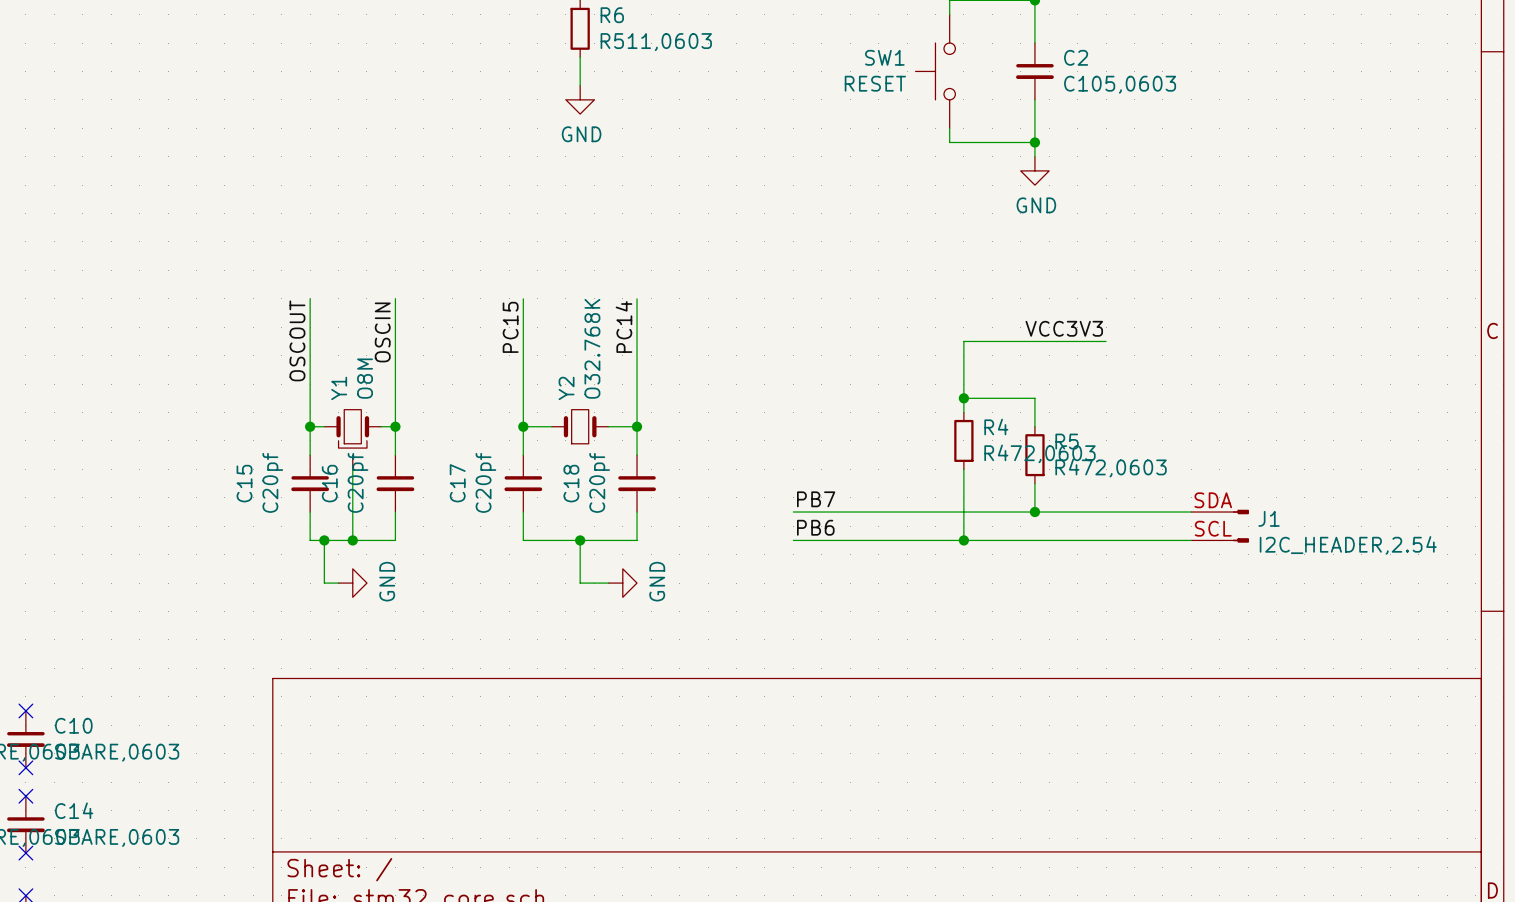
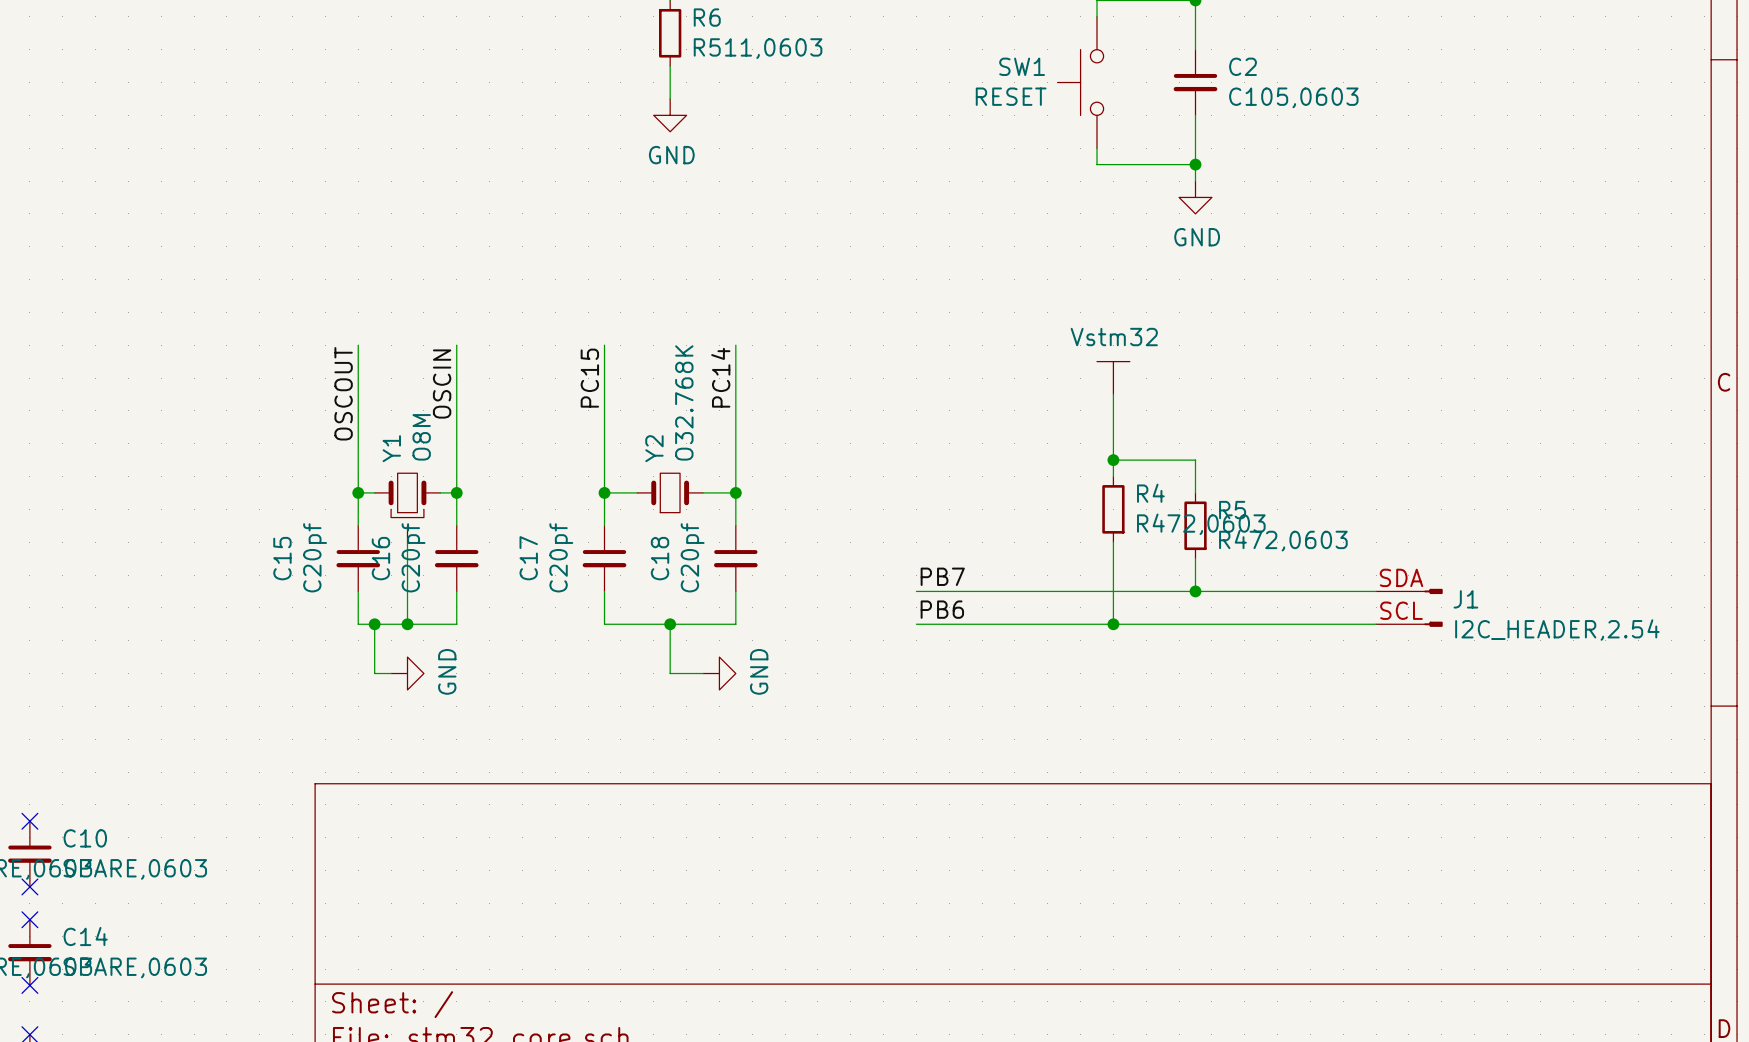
power symbol: none -> Vstm32 (1113, 378)
label: VCC3V3 (1064, 328) -> none
wire: (963, 341) (1106, 341) -> none

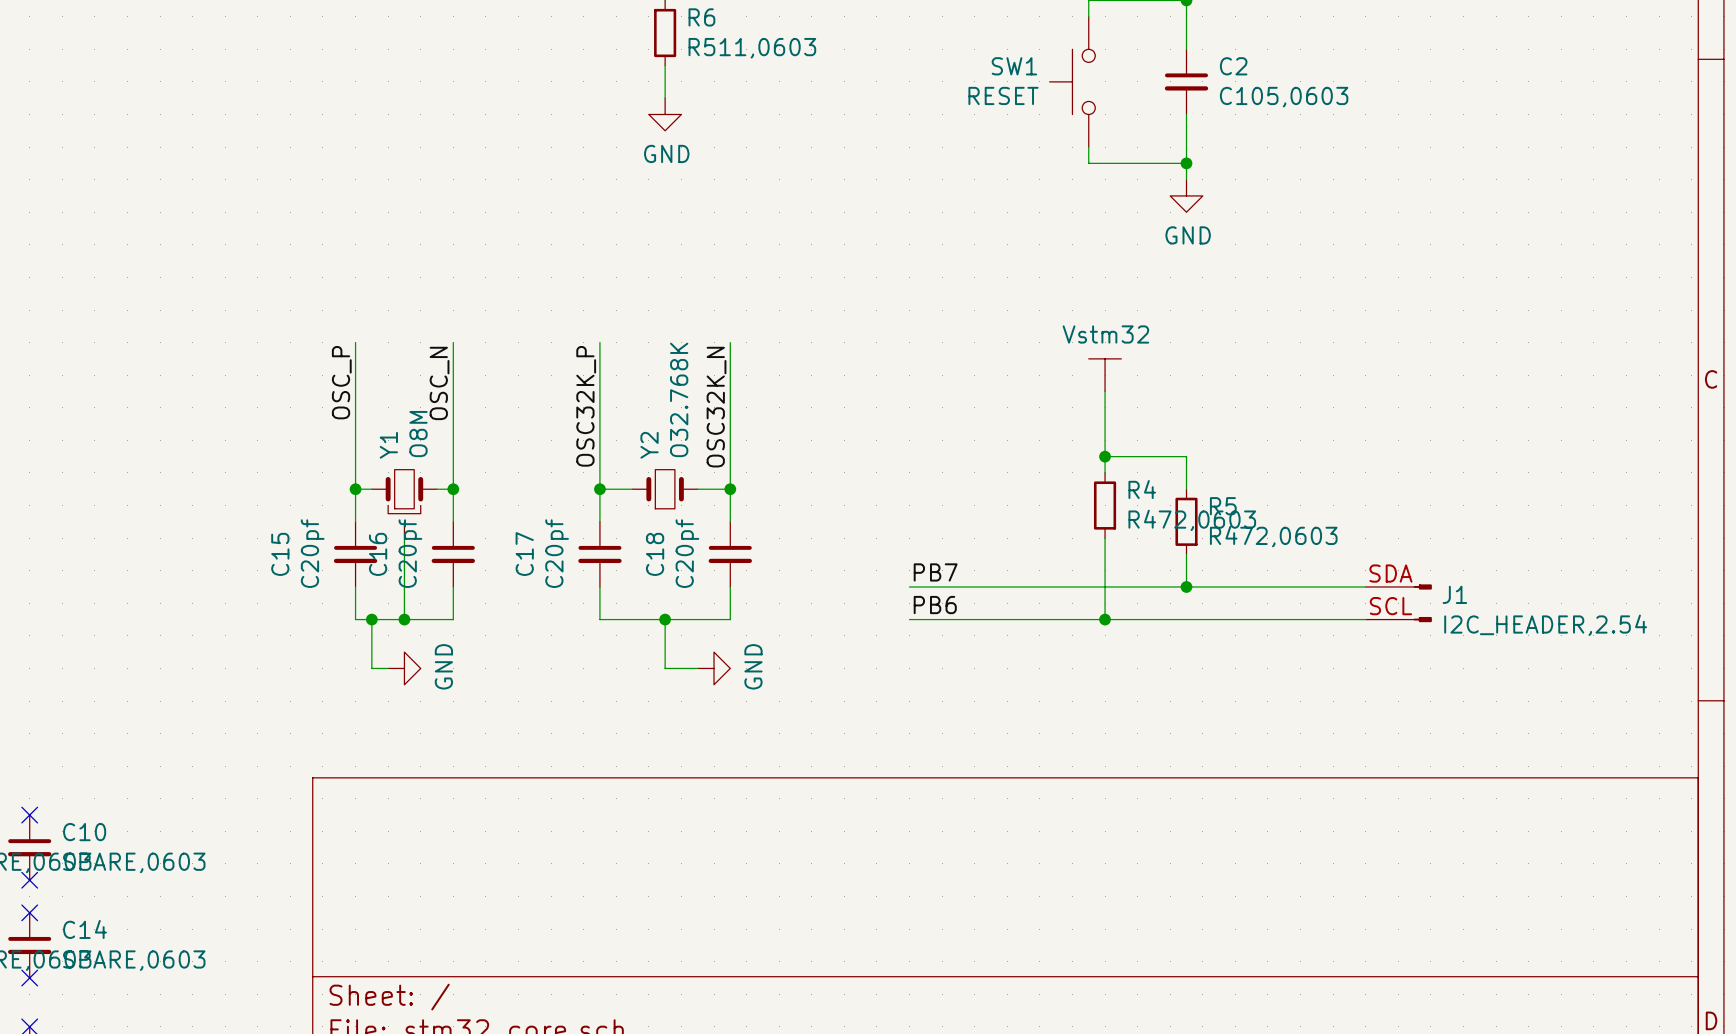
label: PC14 (720, 377) -> OSC32K_N (716, 407)
label: PC15 (589, 378) -> OSC32K_P (586, 406)
label: OSCIN (442, 384) -> OSC_N (439, 383)
label: OSCOUT (343, 393) -> OSC_P (341, 382)

